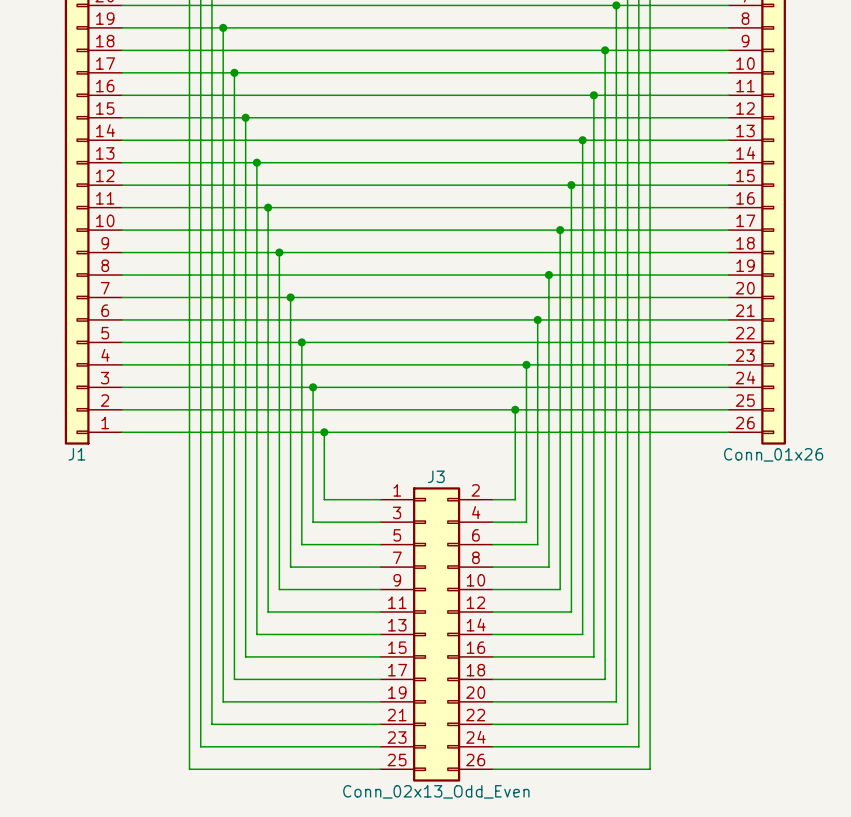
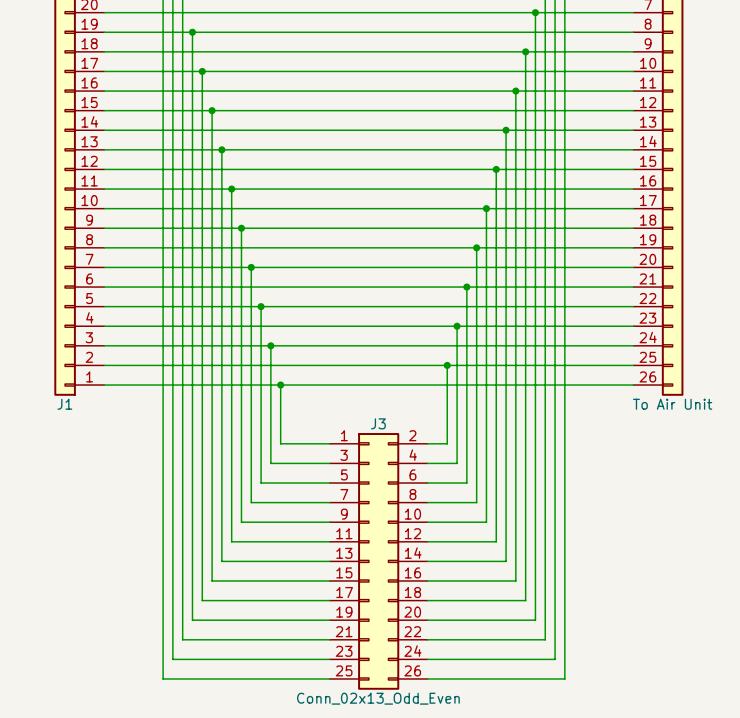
part value: Conn_01x26 (773, 454) -> To Air Unit (672, 404)

